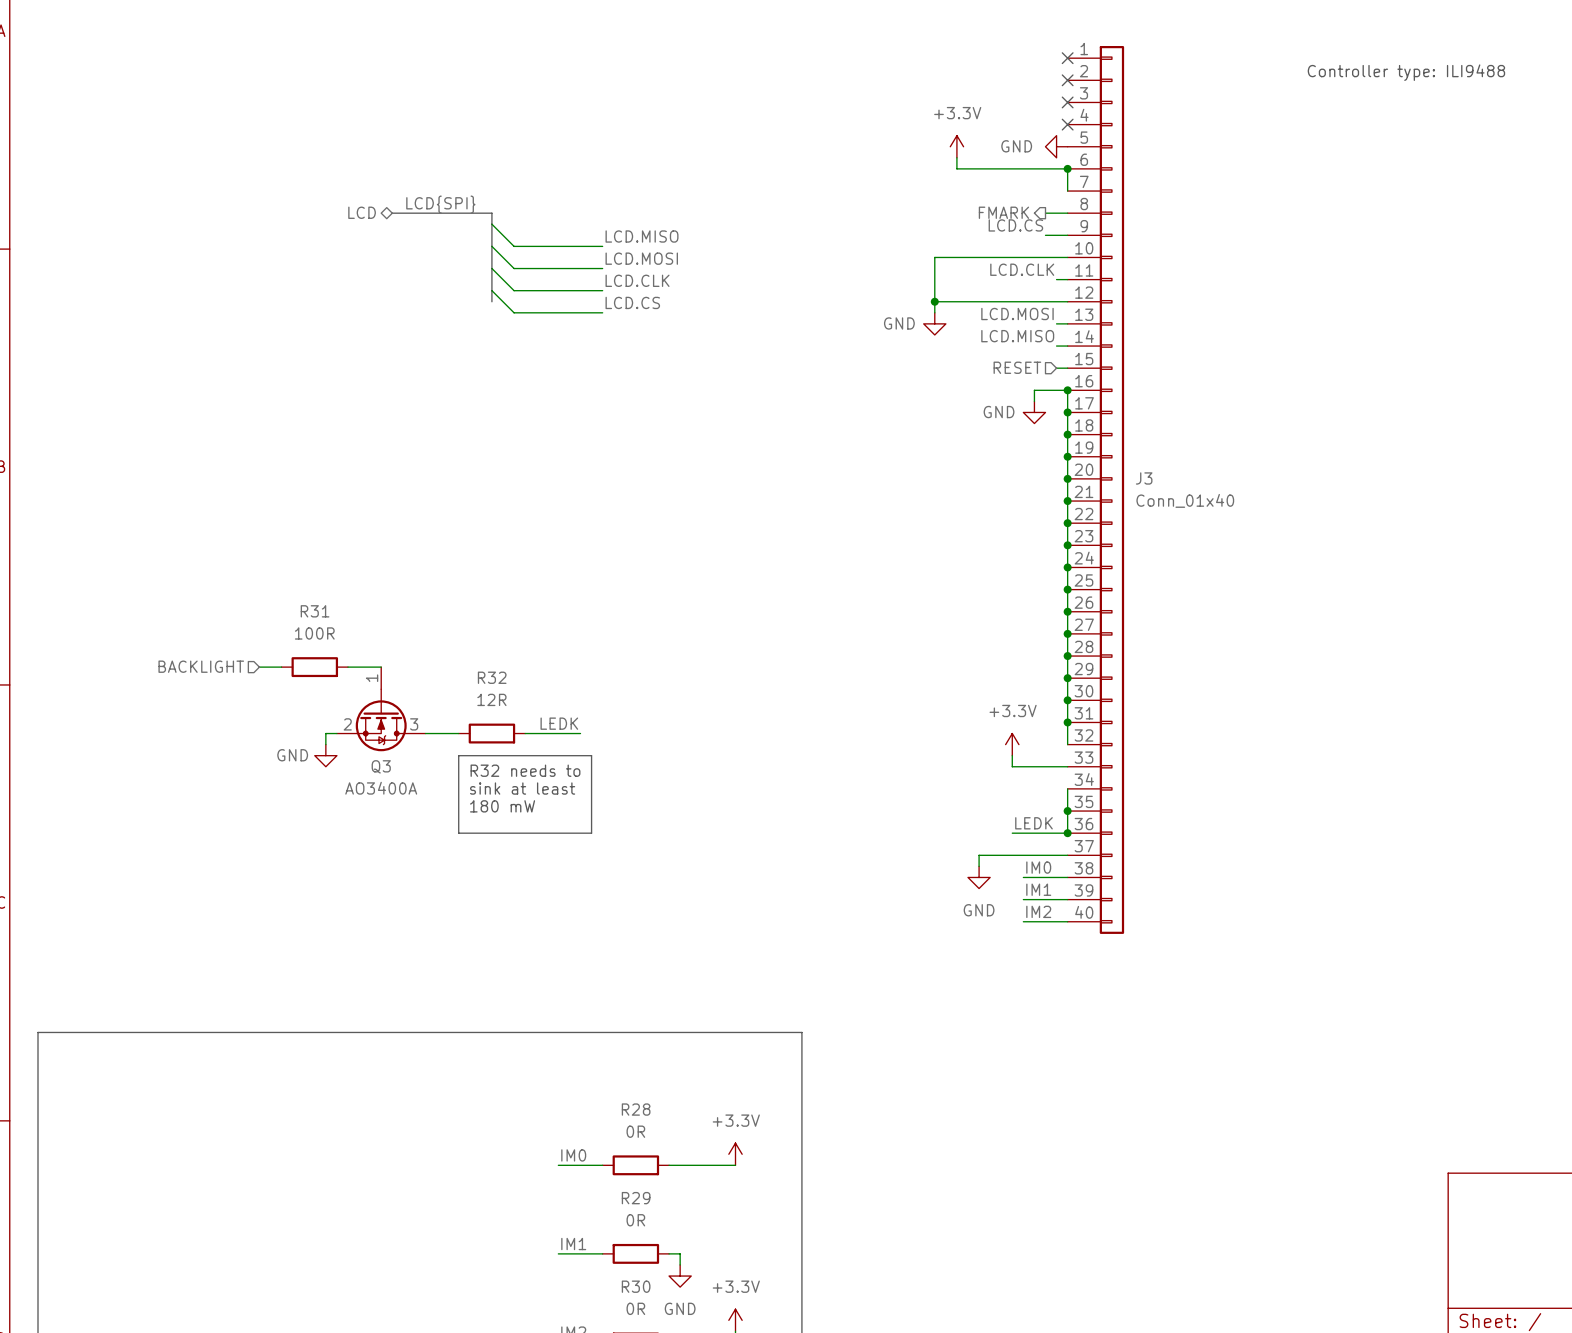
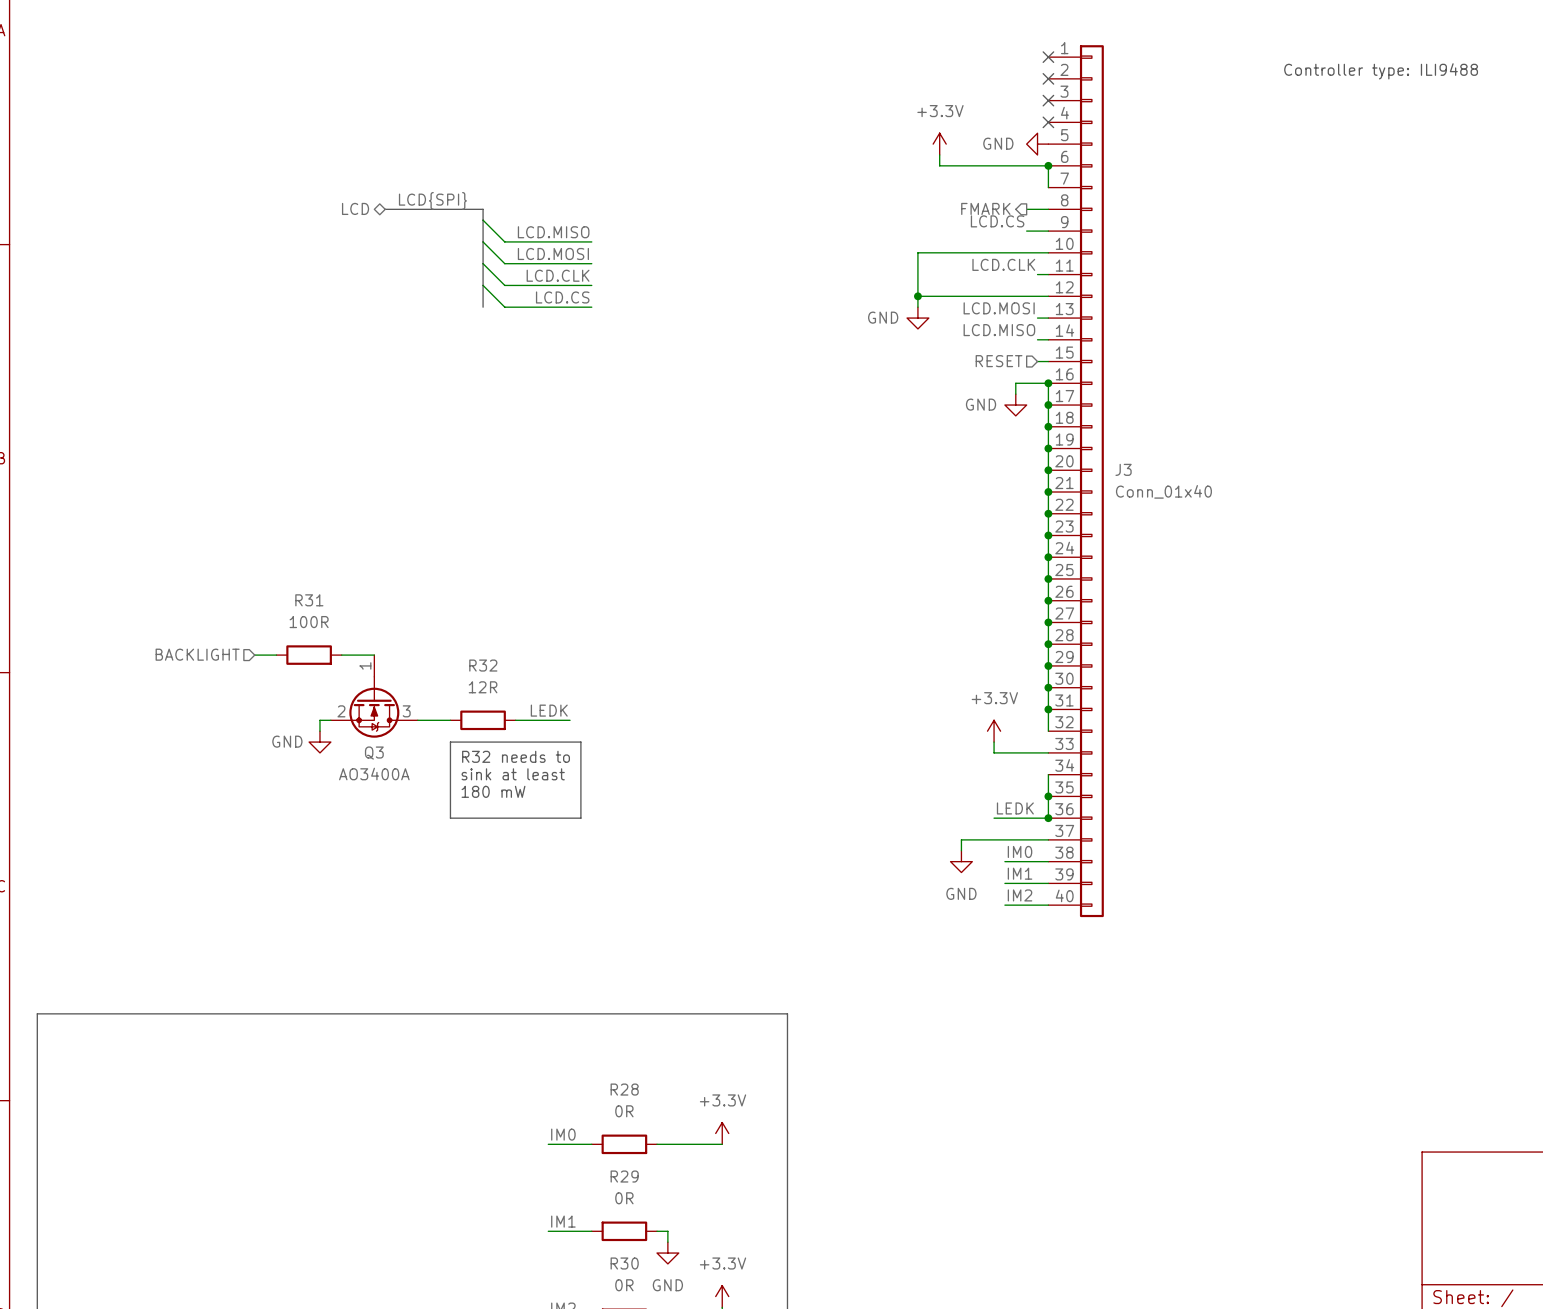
label position: LCD.MISO (642, 236) -> LCD.MISO (553, 232)
label position: LCD.MOSI (641, 258) -> LCD.MOSI (553, 253)
label position: LCD.CLK (637, 280) -> LCD.CLK (558, 275)
bus: none -> (483, 296) (483, 307)
label position: LCD.CS (632, 302) -> LCD.CS (562, 297)

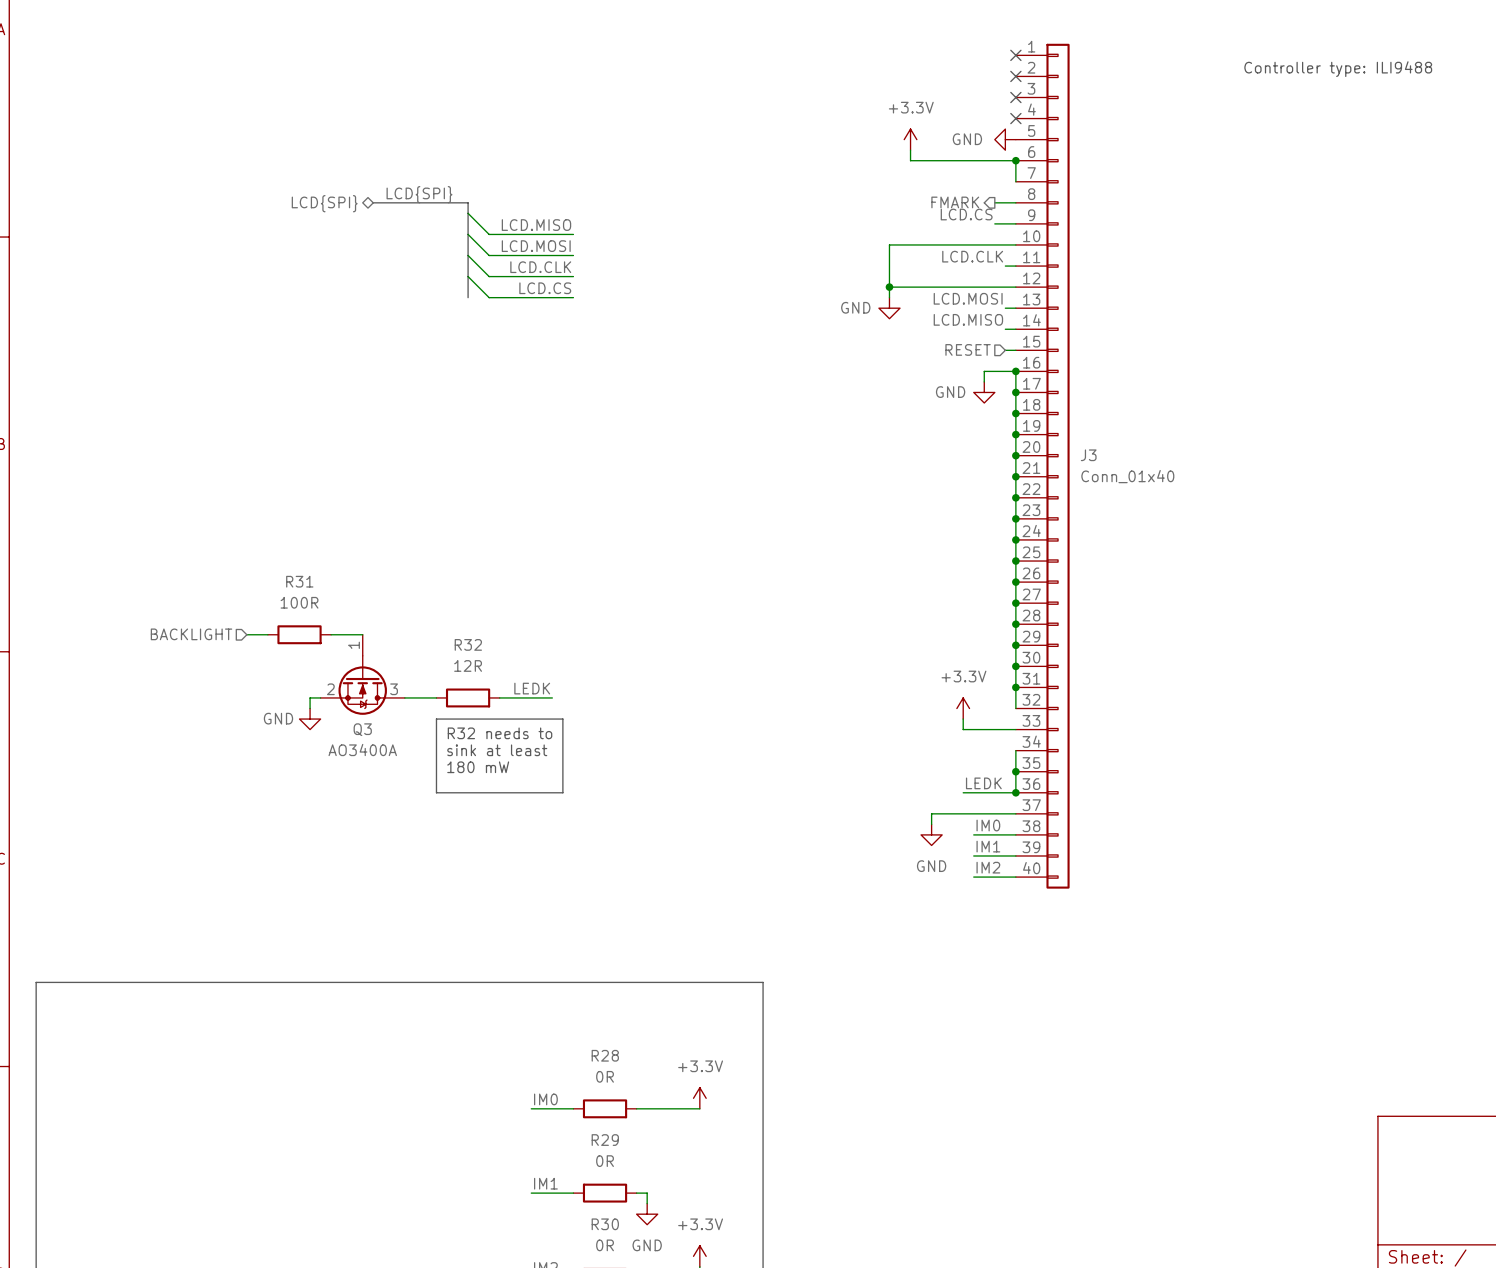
hierarchical label: LCD (355, 208) -> LCD{SPI} (324, 203)

